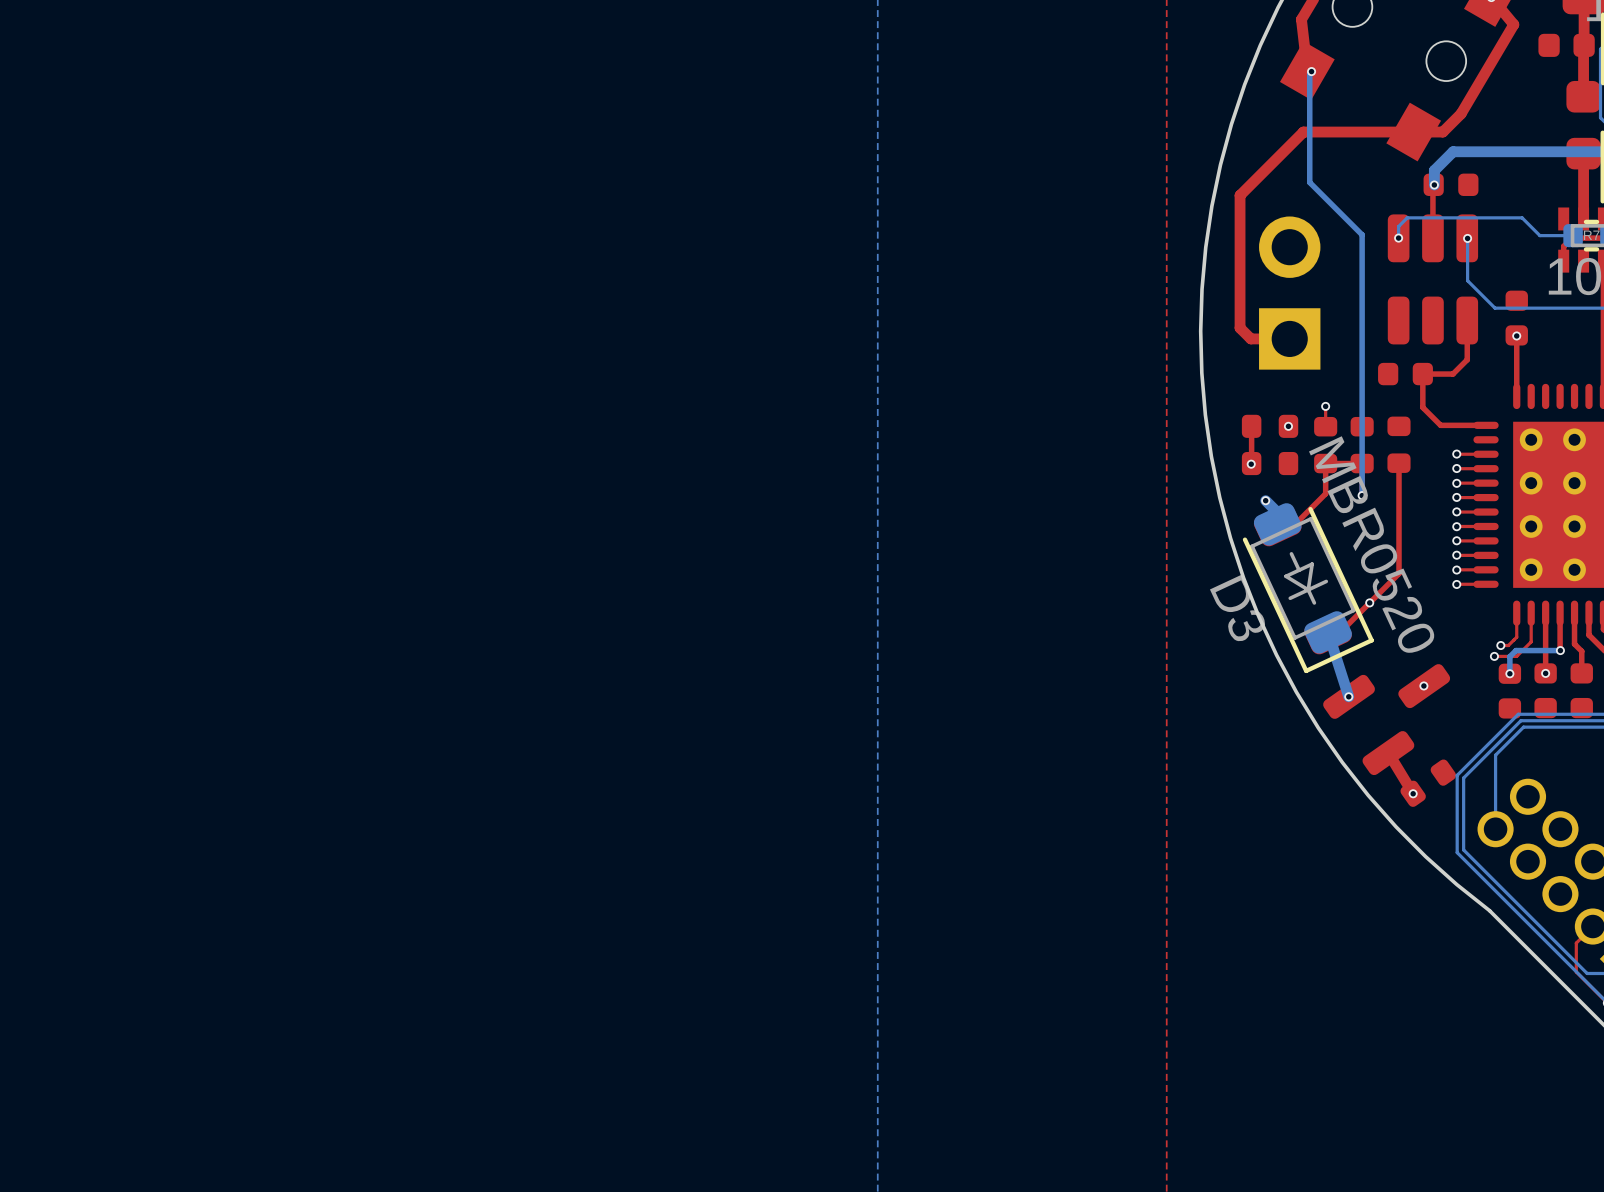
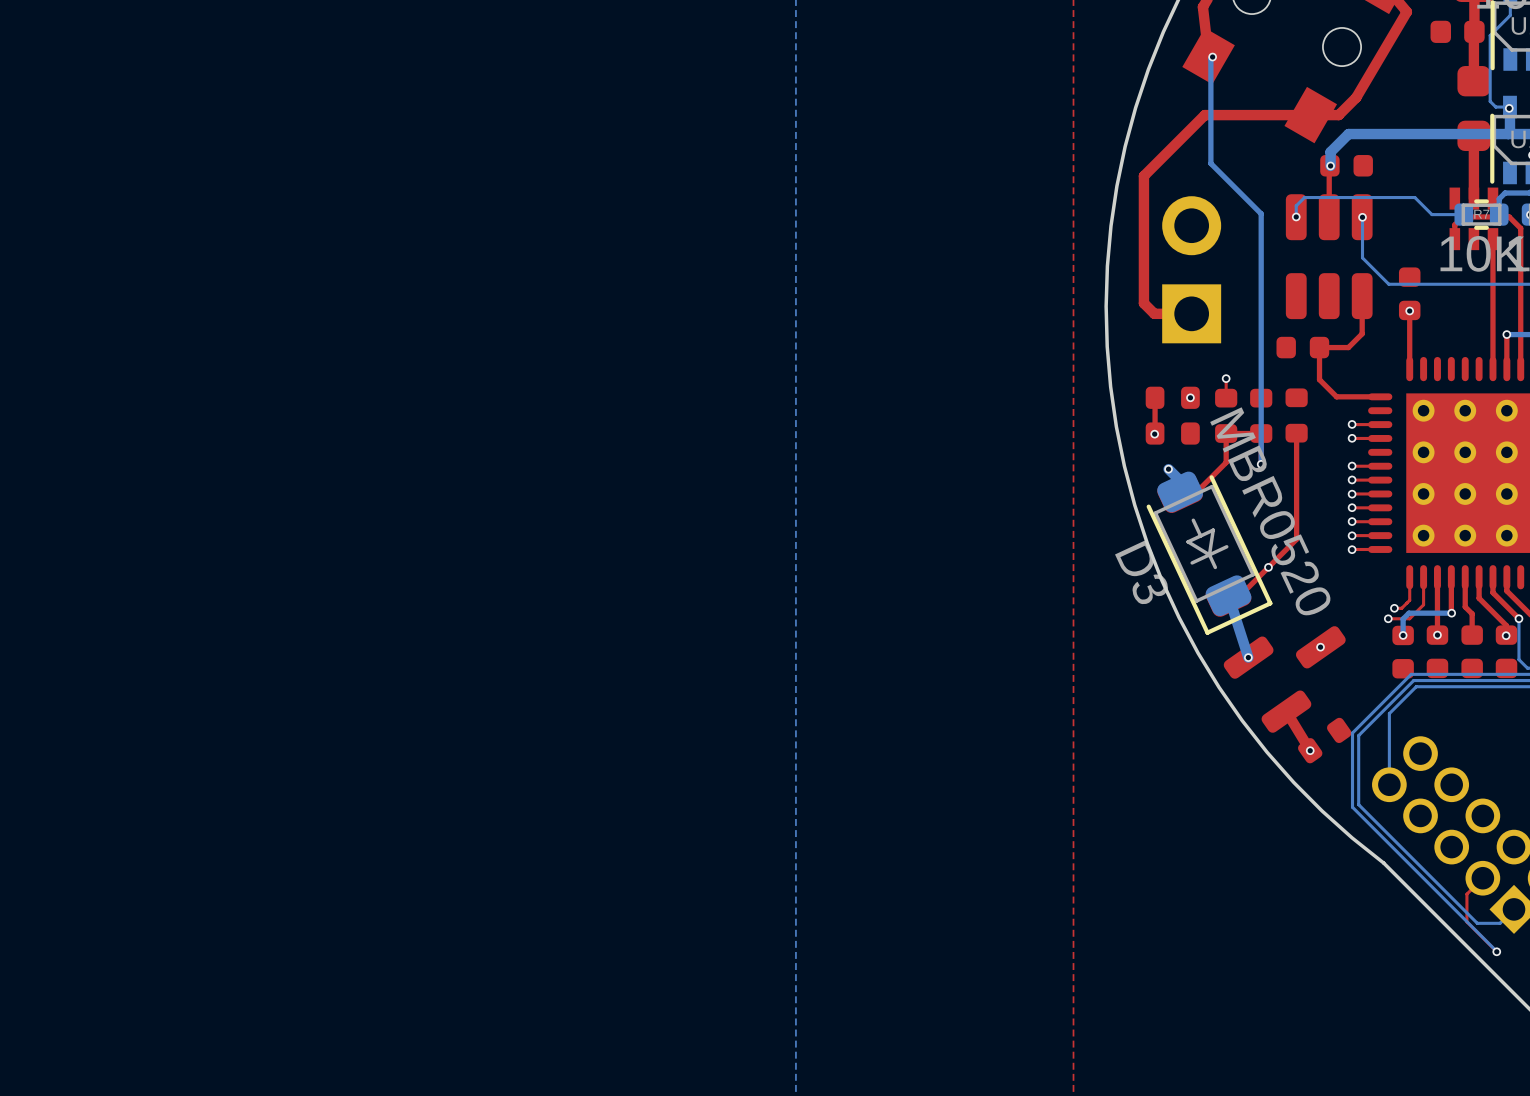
via: (1456, 483) -> none
top track: (1486, 483) (1456, 483) -> none

